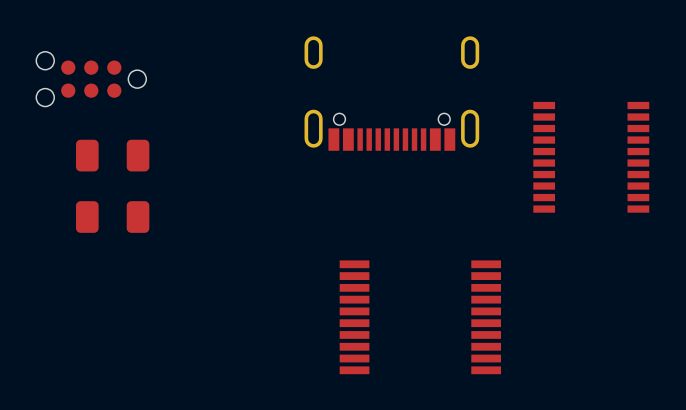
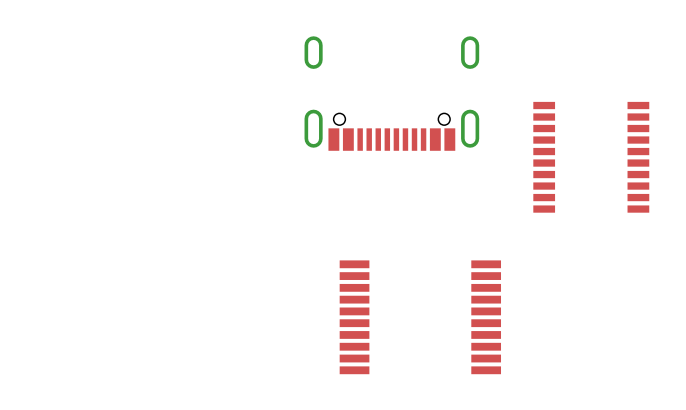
part: (91, 79) -> none
part: (112, 155) -> none
part: (112, 217) -> none

